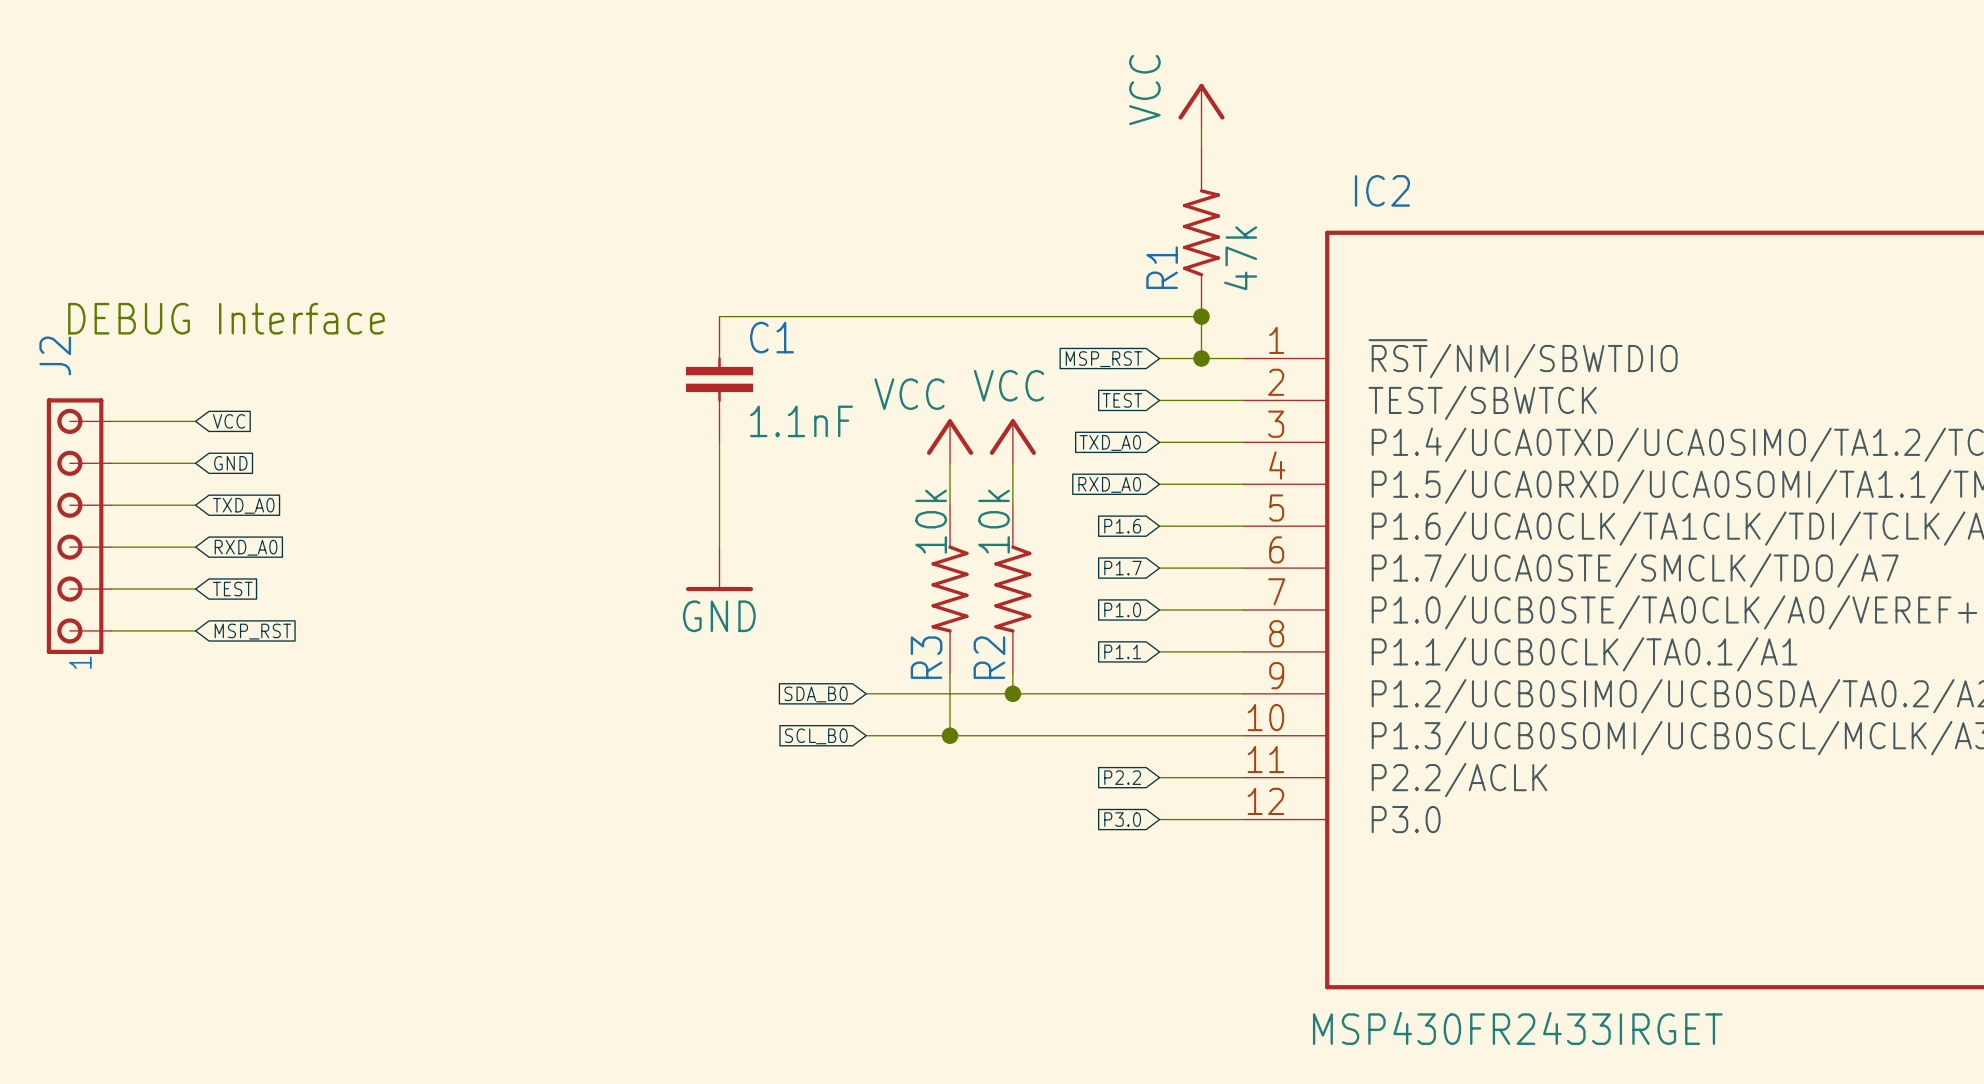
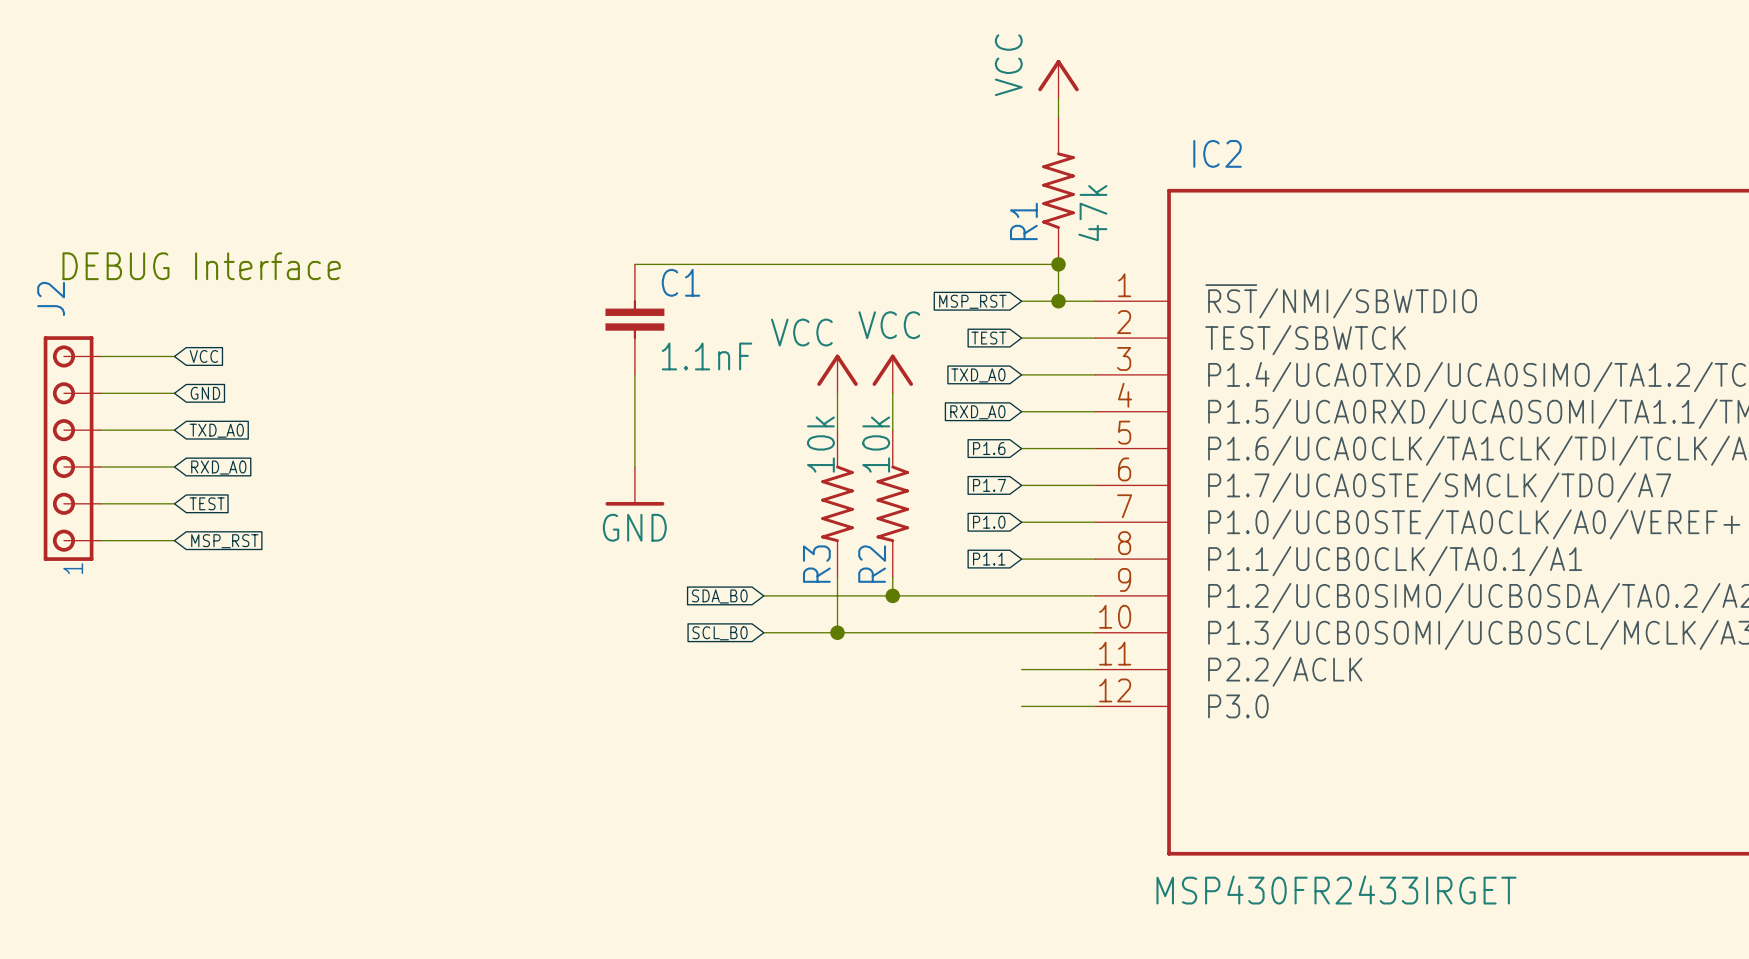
global label: P2.2 (1122, 777) -> none
global label: P3.0 (1122, 819) -> none

